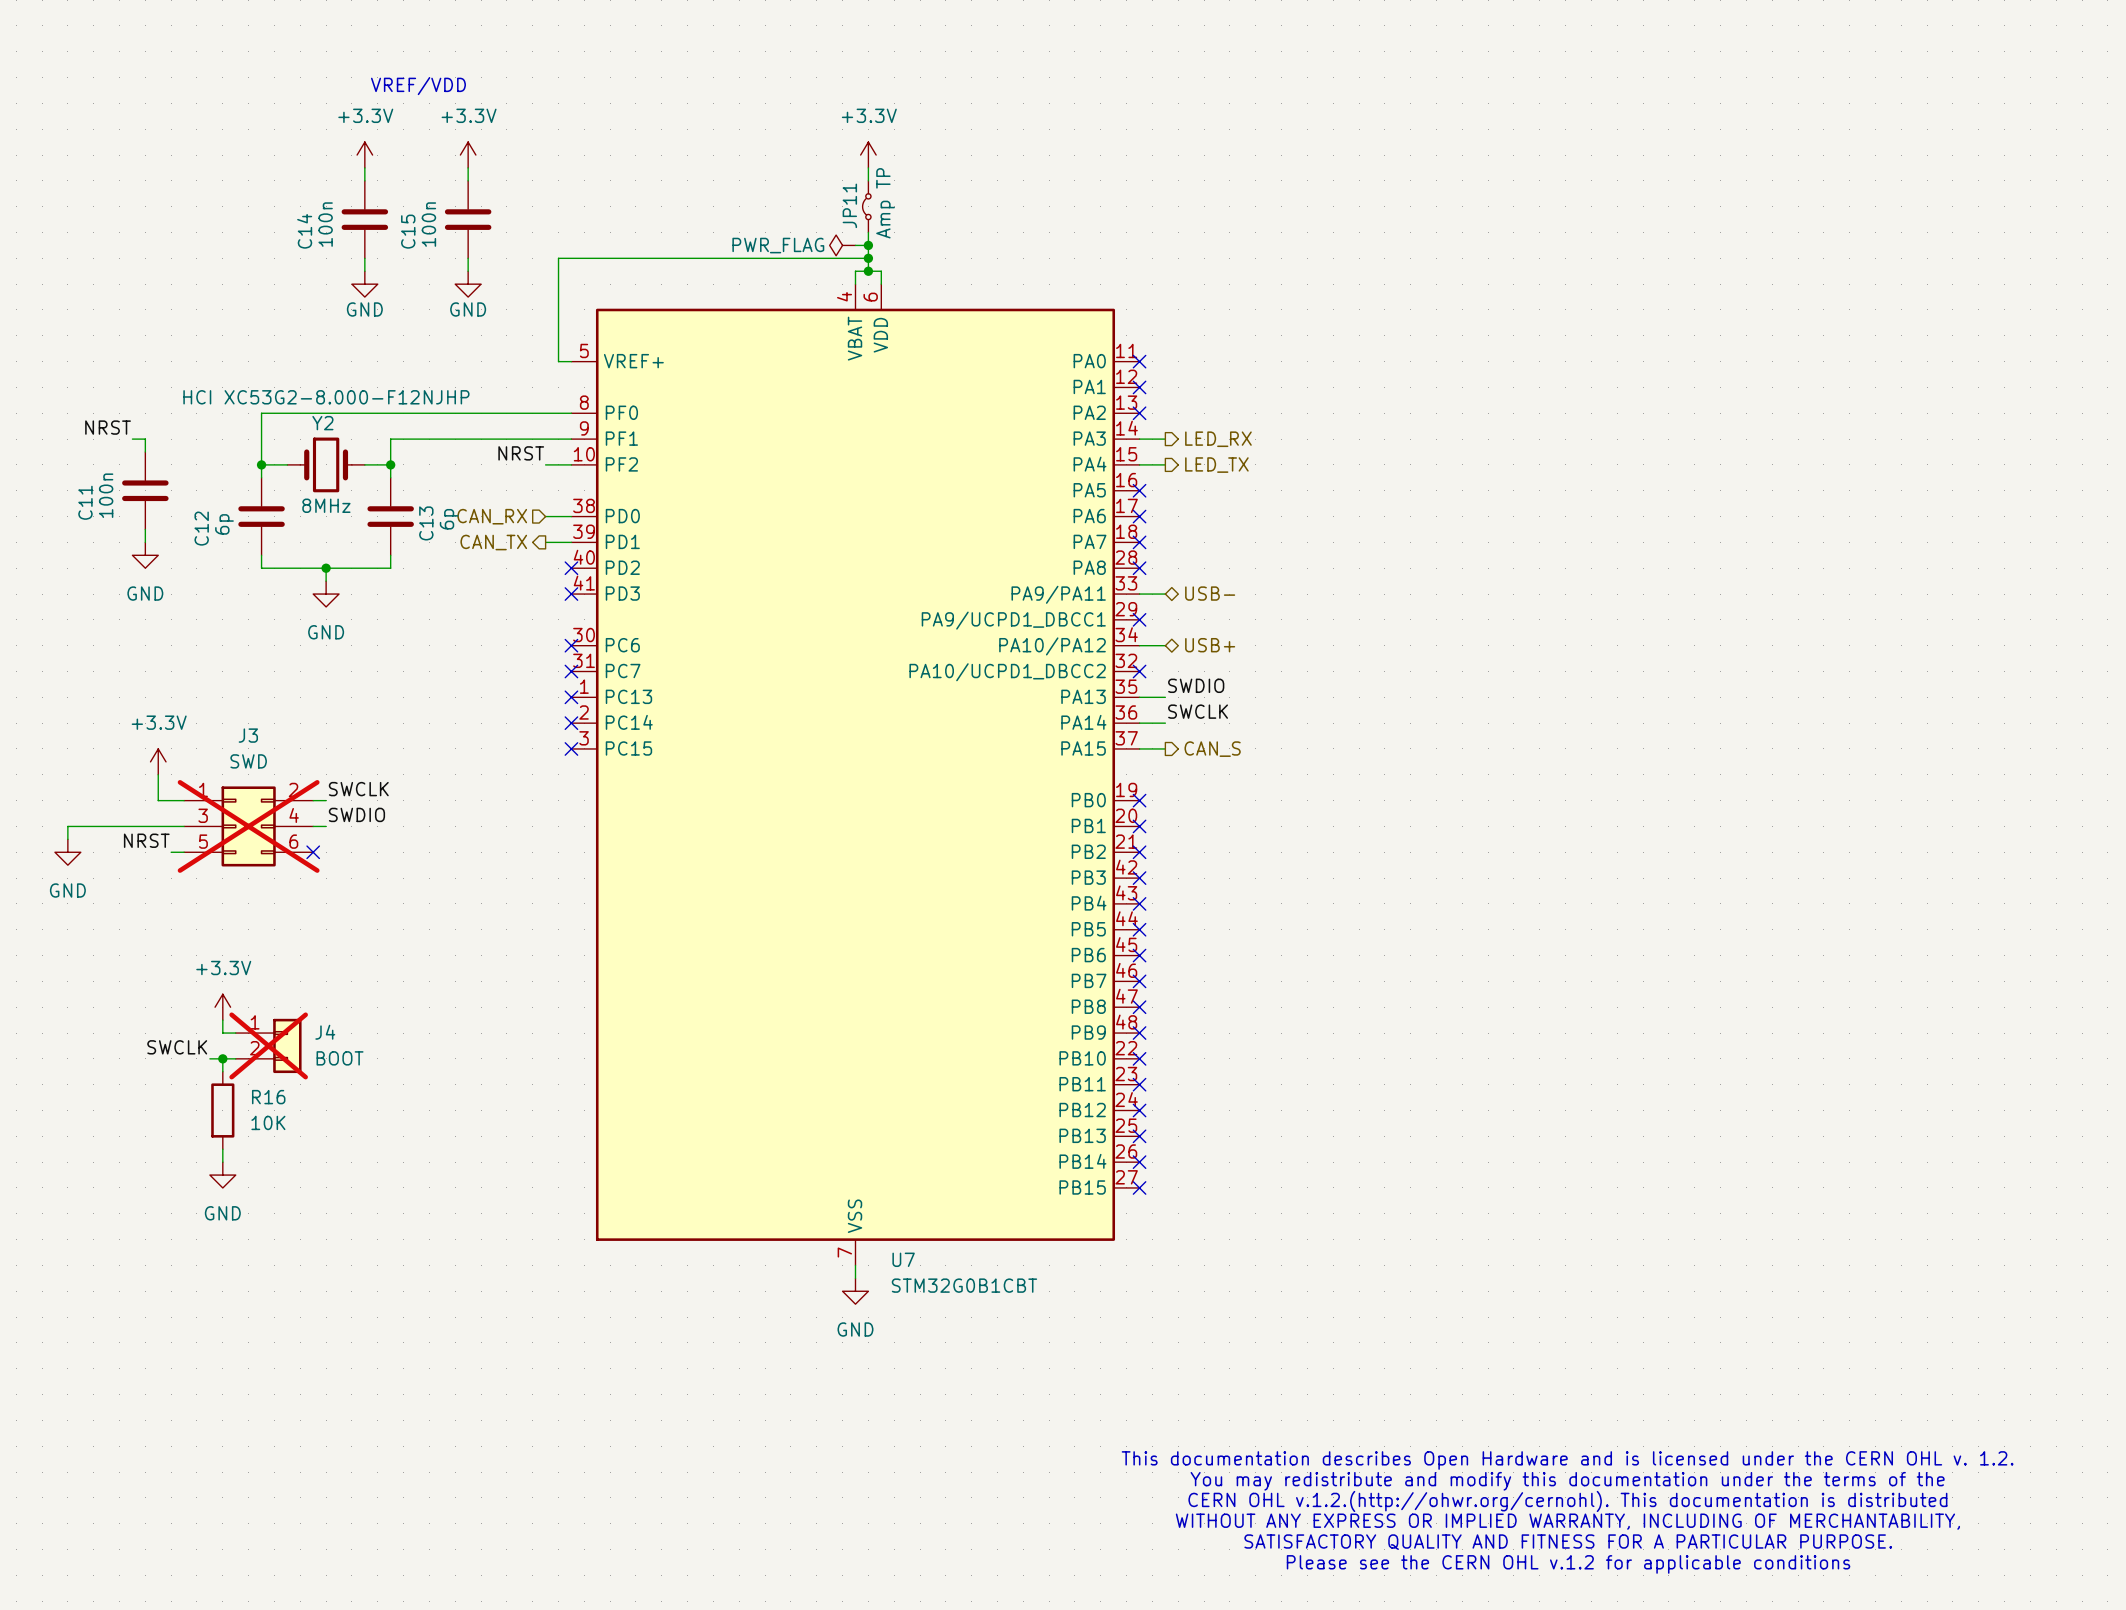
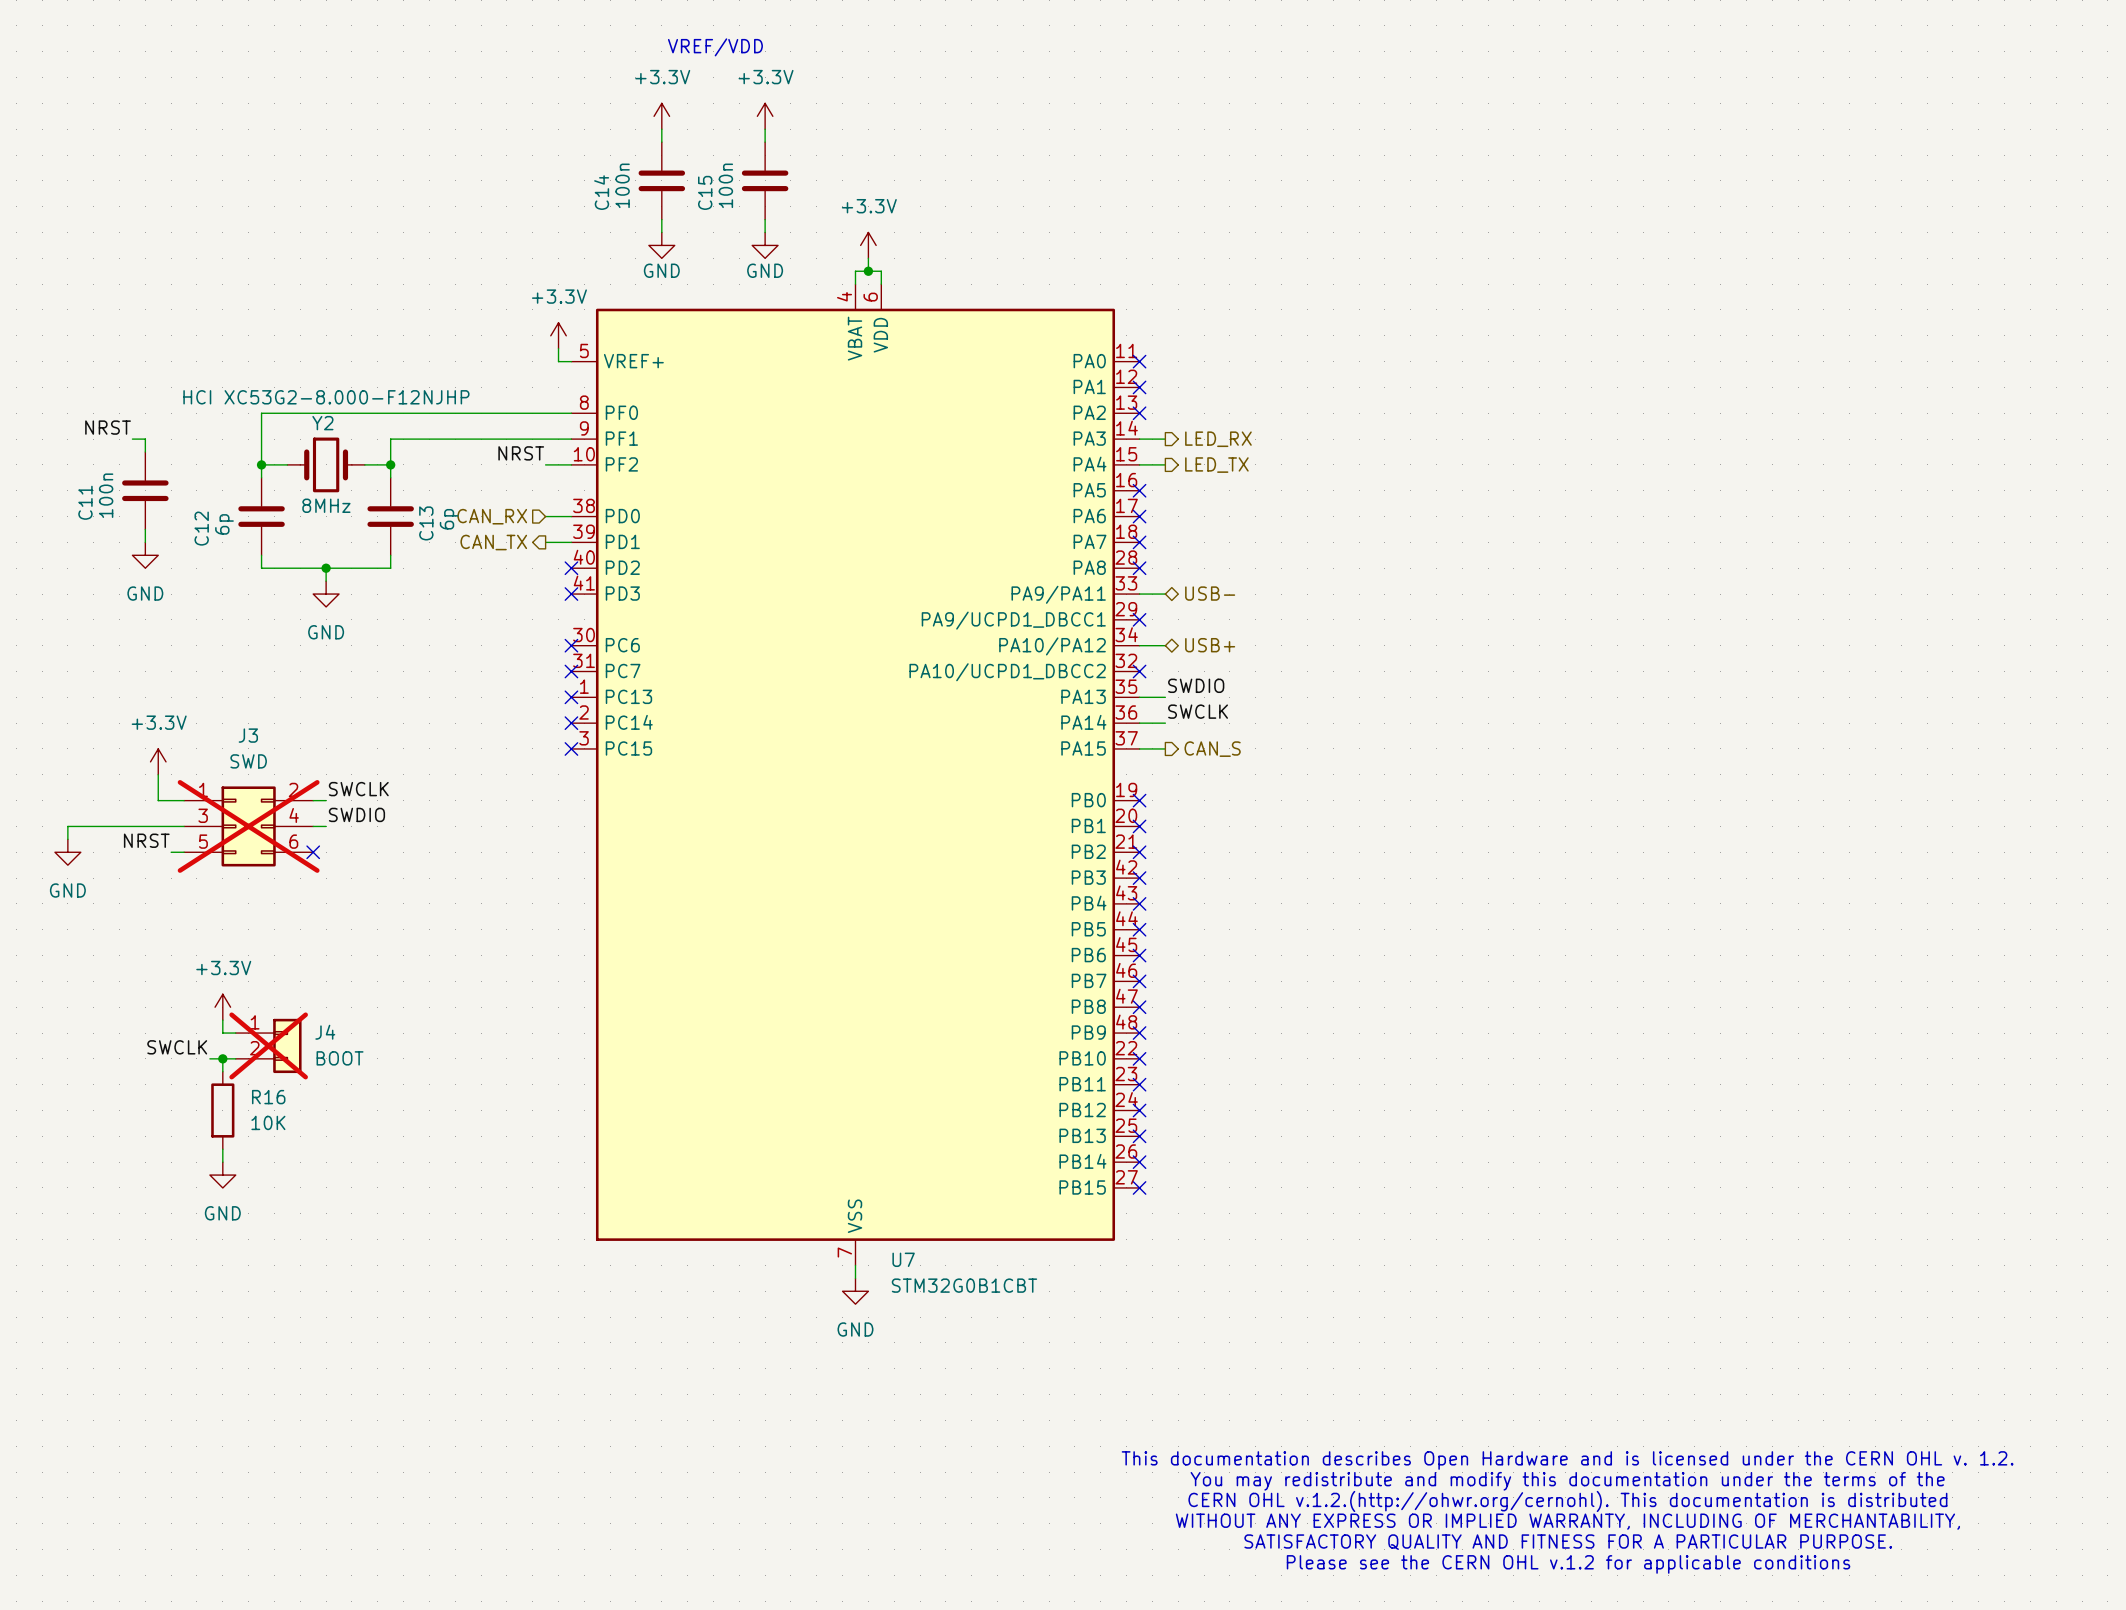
text: none -> VREF/VDD (715, 47)
text: VREF/VDD (418, 86) -> none
power symbol: none -> +3.3V (661, 116)
power symbol: none -> +3.3V (765, 116)
power symbol: +3.3V (364, 155) -> none
power symbol: +3.3V (468, 155) -> none
power symbol: +3.3V (868, 155) -> none
wire: (364, 167) (364, 180) -> none
wire: (468, 167) (468, 180) -> (661, 129) (661, 142)
wire: (868, 167) (868, 180) -> (765, 129) (765, 142)
JP11: Amp TP (866, 206) -> none
C14 position: (364, 219) -> (661, 180)
C15 position: (468, 219) -> (765, 180)
wire: none -> (765, 219) (765, 232)
wire: (868, 232) (868, 258) (558, 258) (558, 348) -> none
power symbol: none -> GND (661, 245)
power symbol: none -> GND (765, 245)
power symbol: PWR_FLAG (842, 245) -> none
wire: (855, 245) (868, 245) -> none
junction: (868, 245) -> none
power symbol: none -> +3.3V (868, 245)
wire: (364, 258) (364, 271) -> none
wire: (468, 258) (468, 271) -> (661, 219) (661, 232)
junction: (868, 258) -> none
power symbol: GND (364, 284) -> none
power symbol: GND (468, 284) -> none
power symbol: none -> +3.3V (558, 335)

